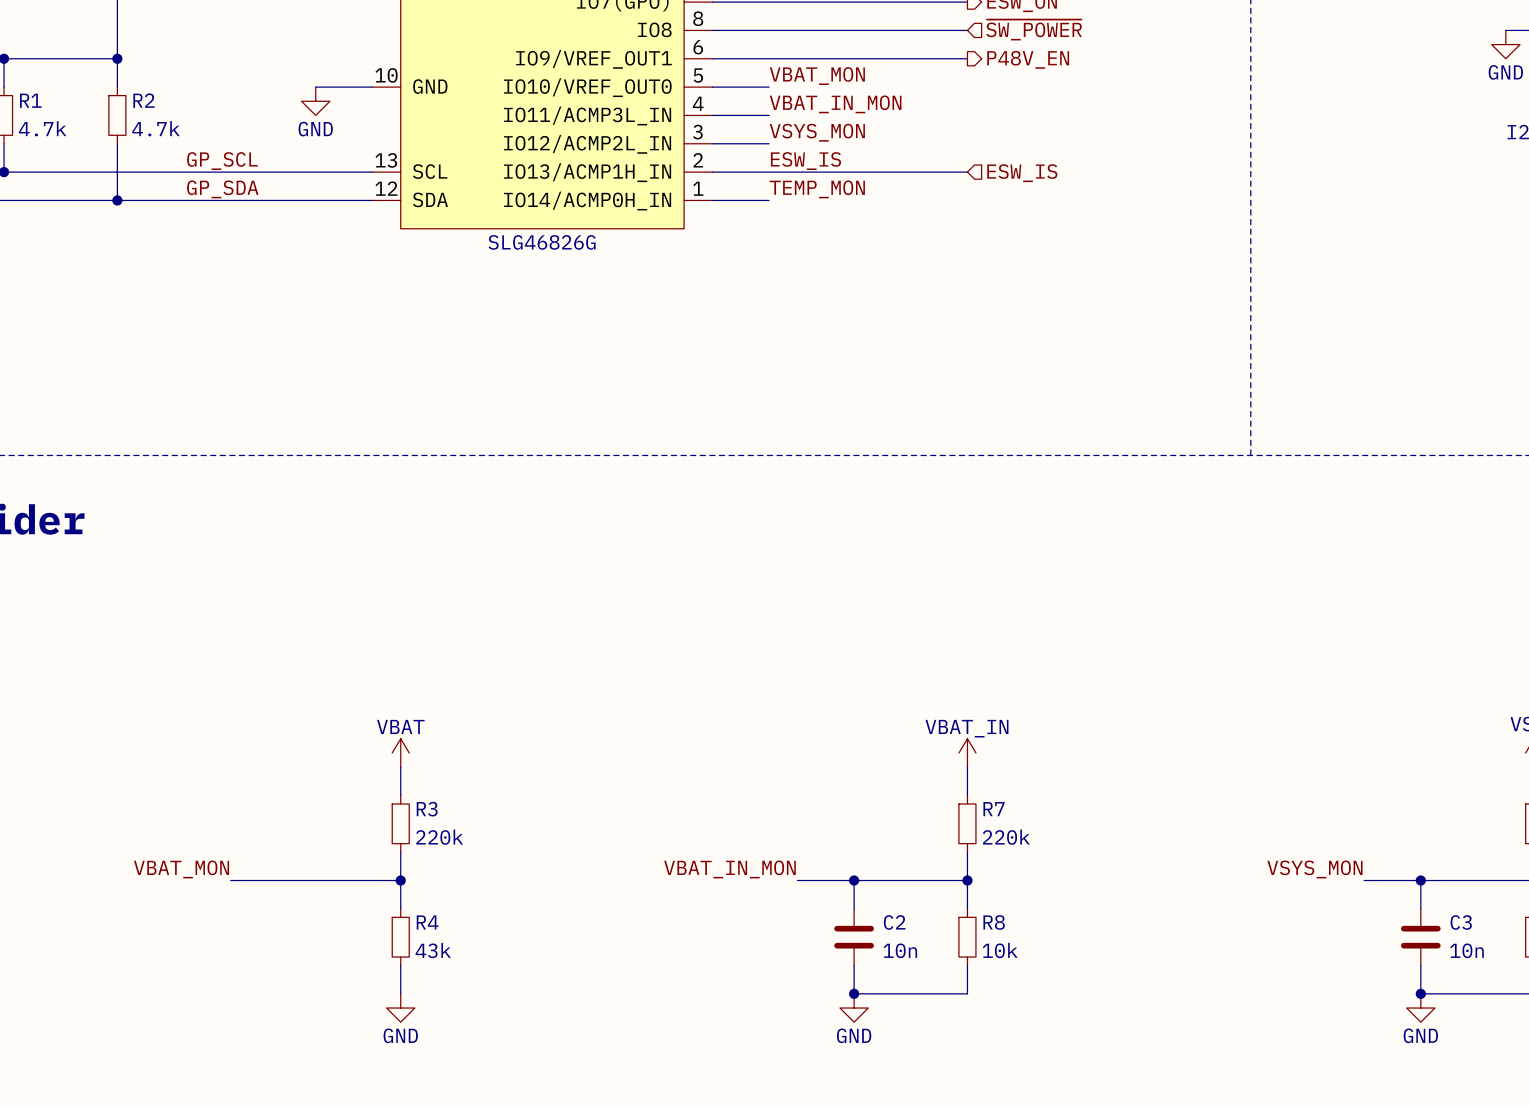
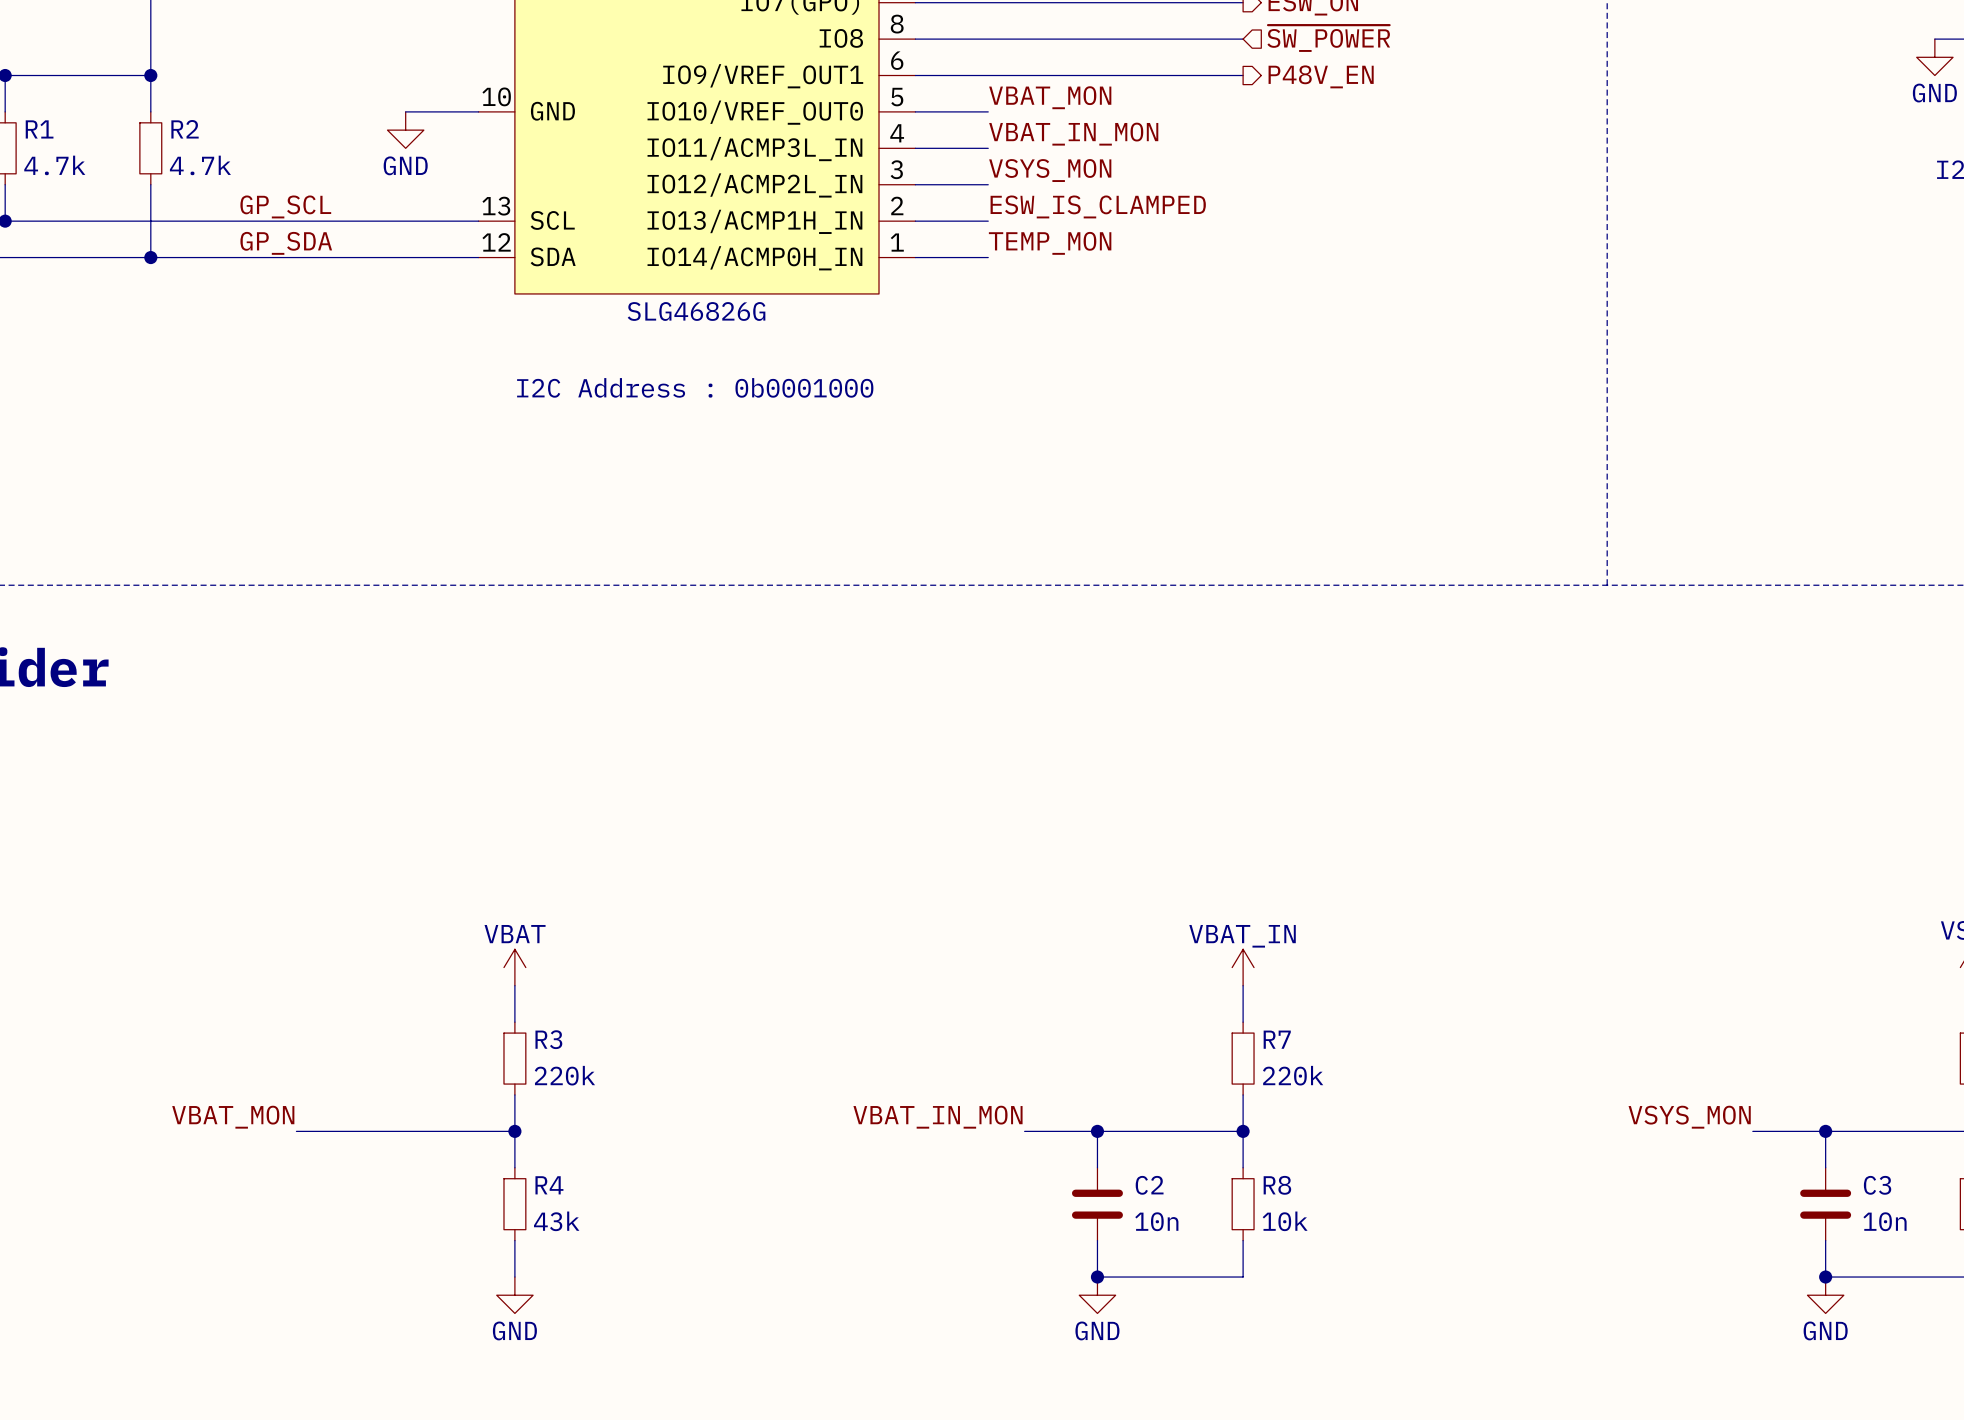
label: ESW_IS (805, 161) -> ESW_IS_CLAMPED (1098, 206)
wire: (769, 172) (967, 172) -> none
hierarchical label: ESW_IS (1022, 173) -> none
text: none -> I2C Address : 0b0001000 (695, 387)

